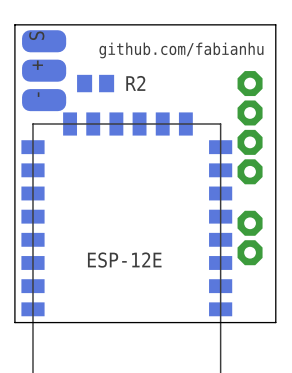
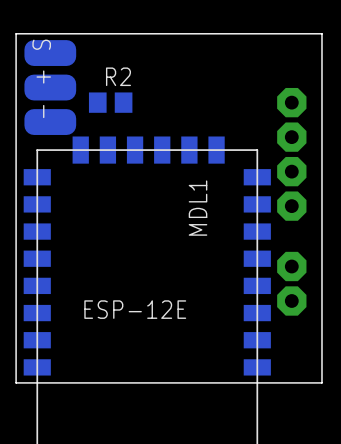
text: github.com/fabianhu (181, 50) -> none
R2 name position: R2 (135, 83) -> R2 (118, 76)
MDL1 name: none -> MDL1 (198, 208)

